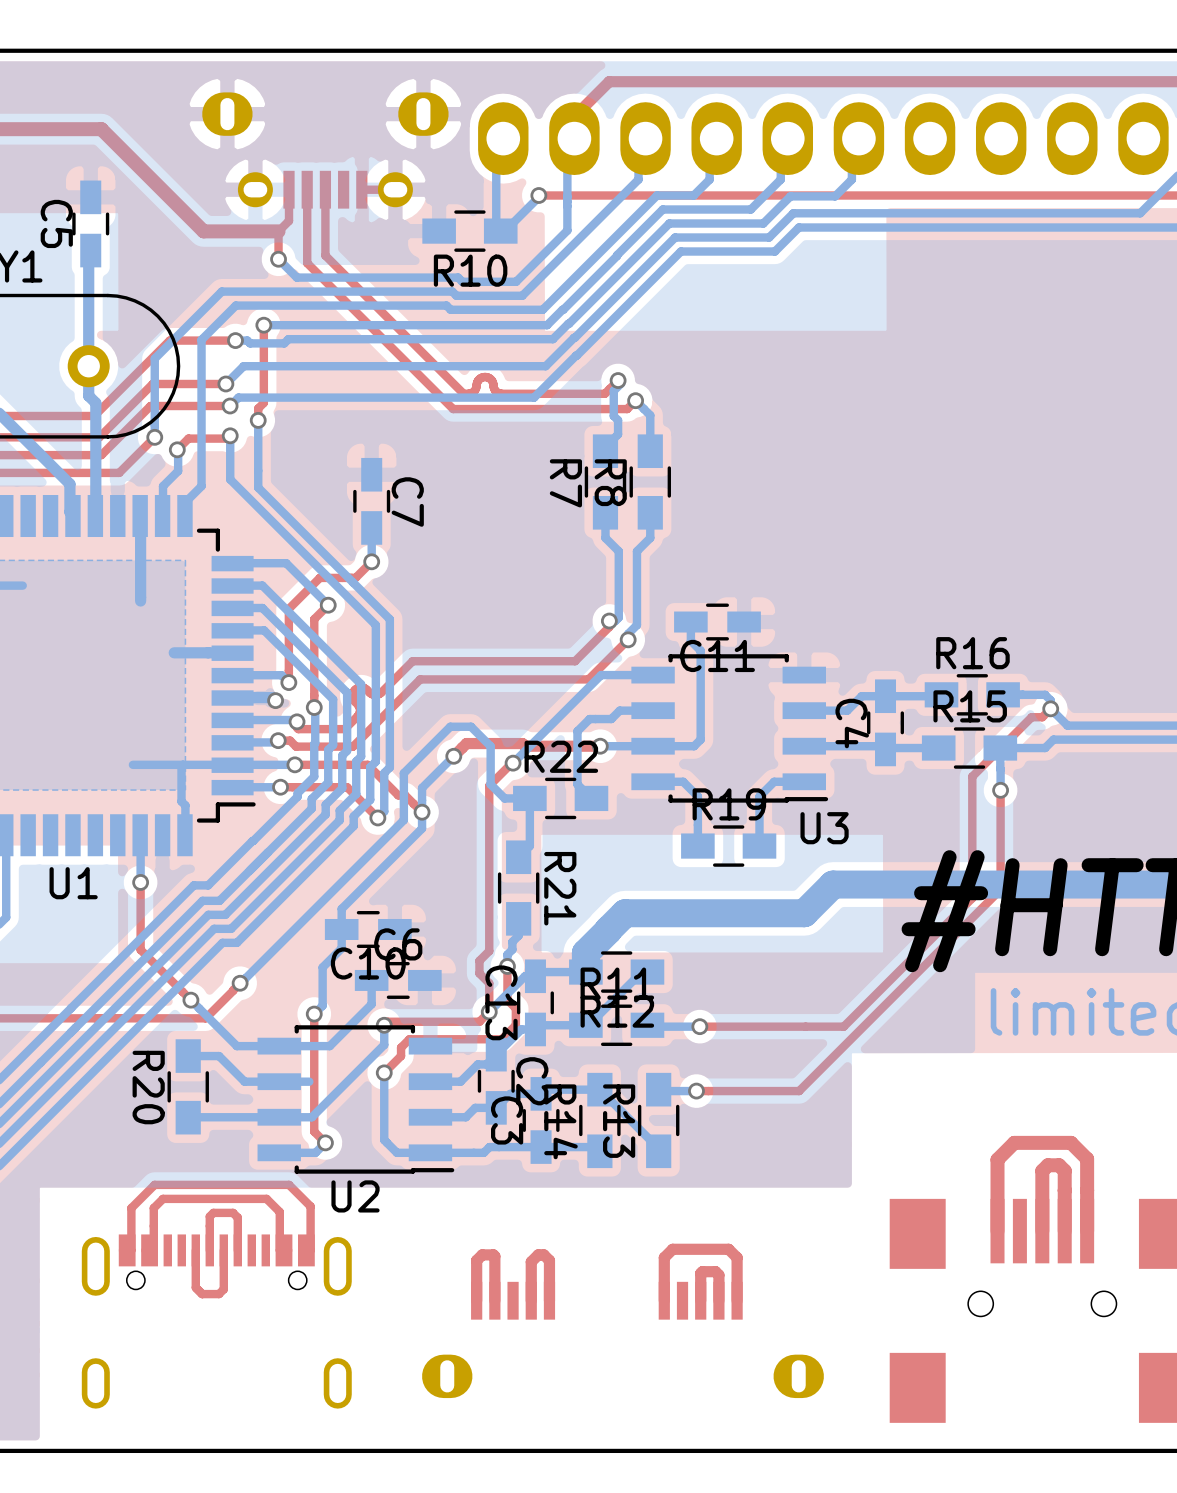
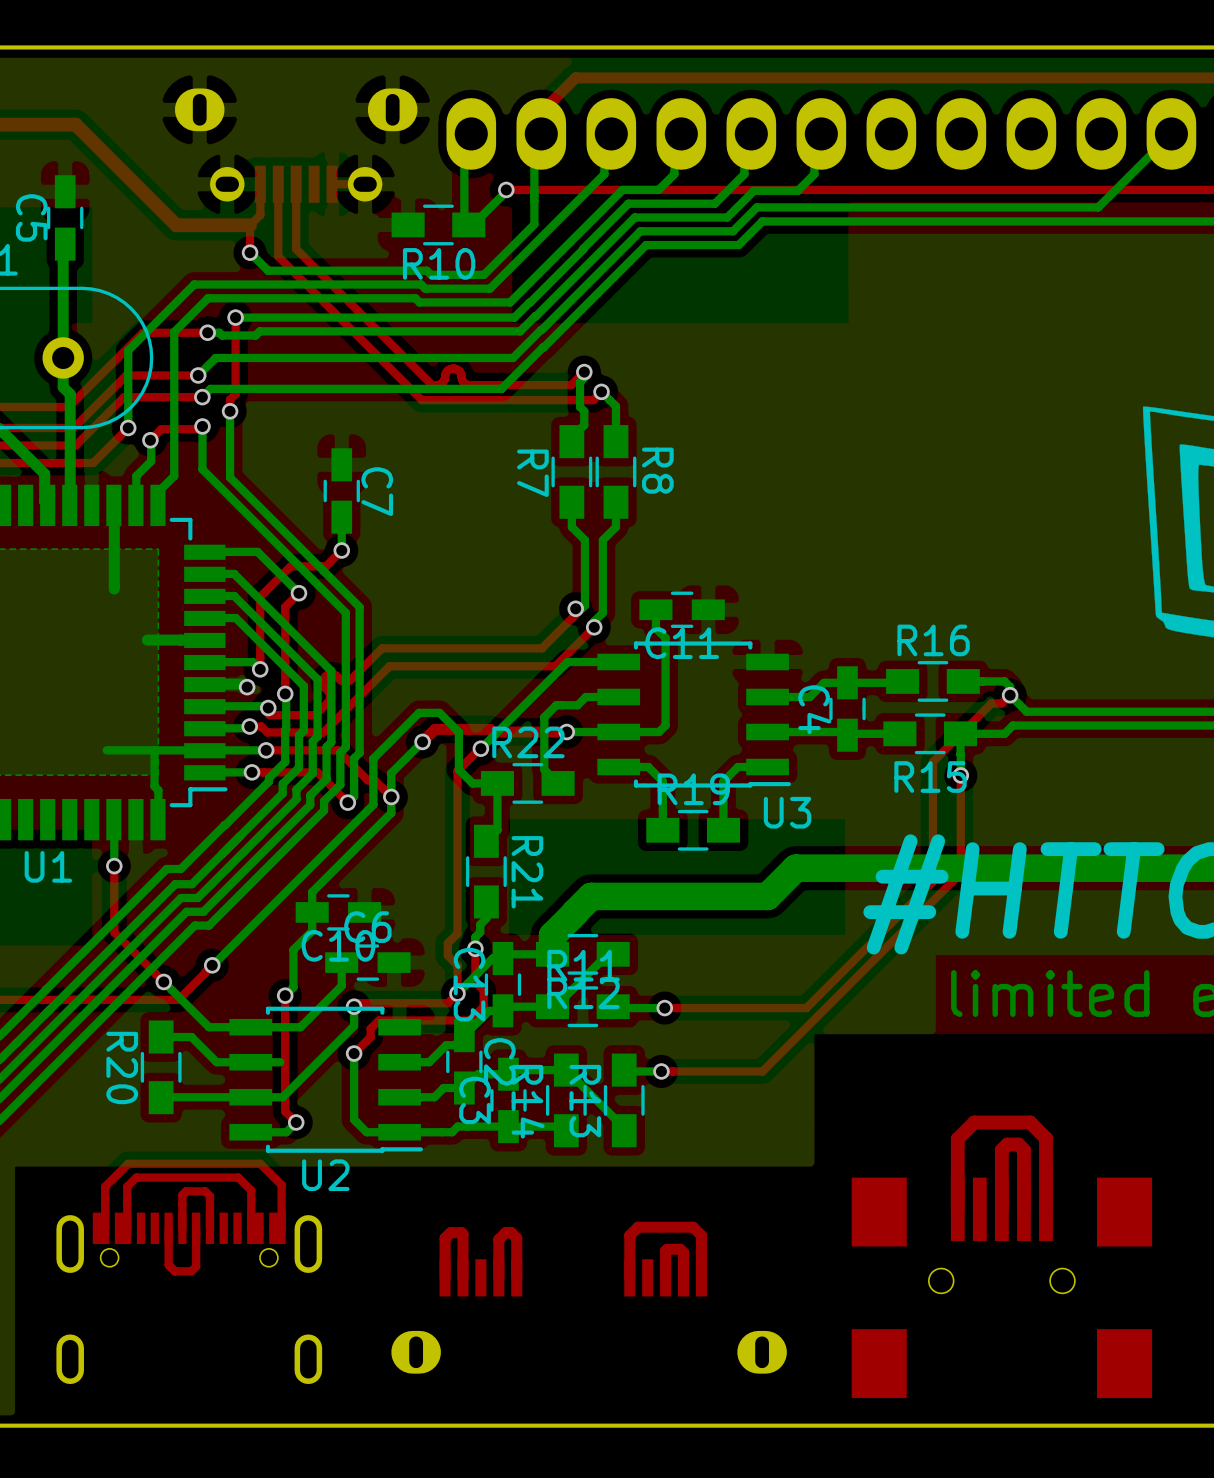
R8 name position: R8 (610, 482) -> R8 (657, 470)
R15 name position: R15 (970, 706) -> R15 (930, 777)

